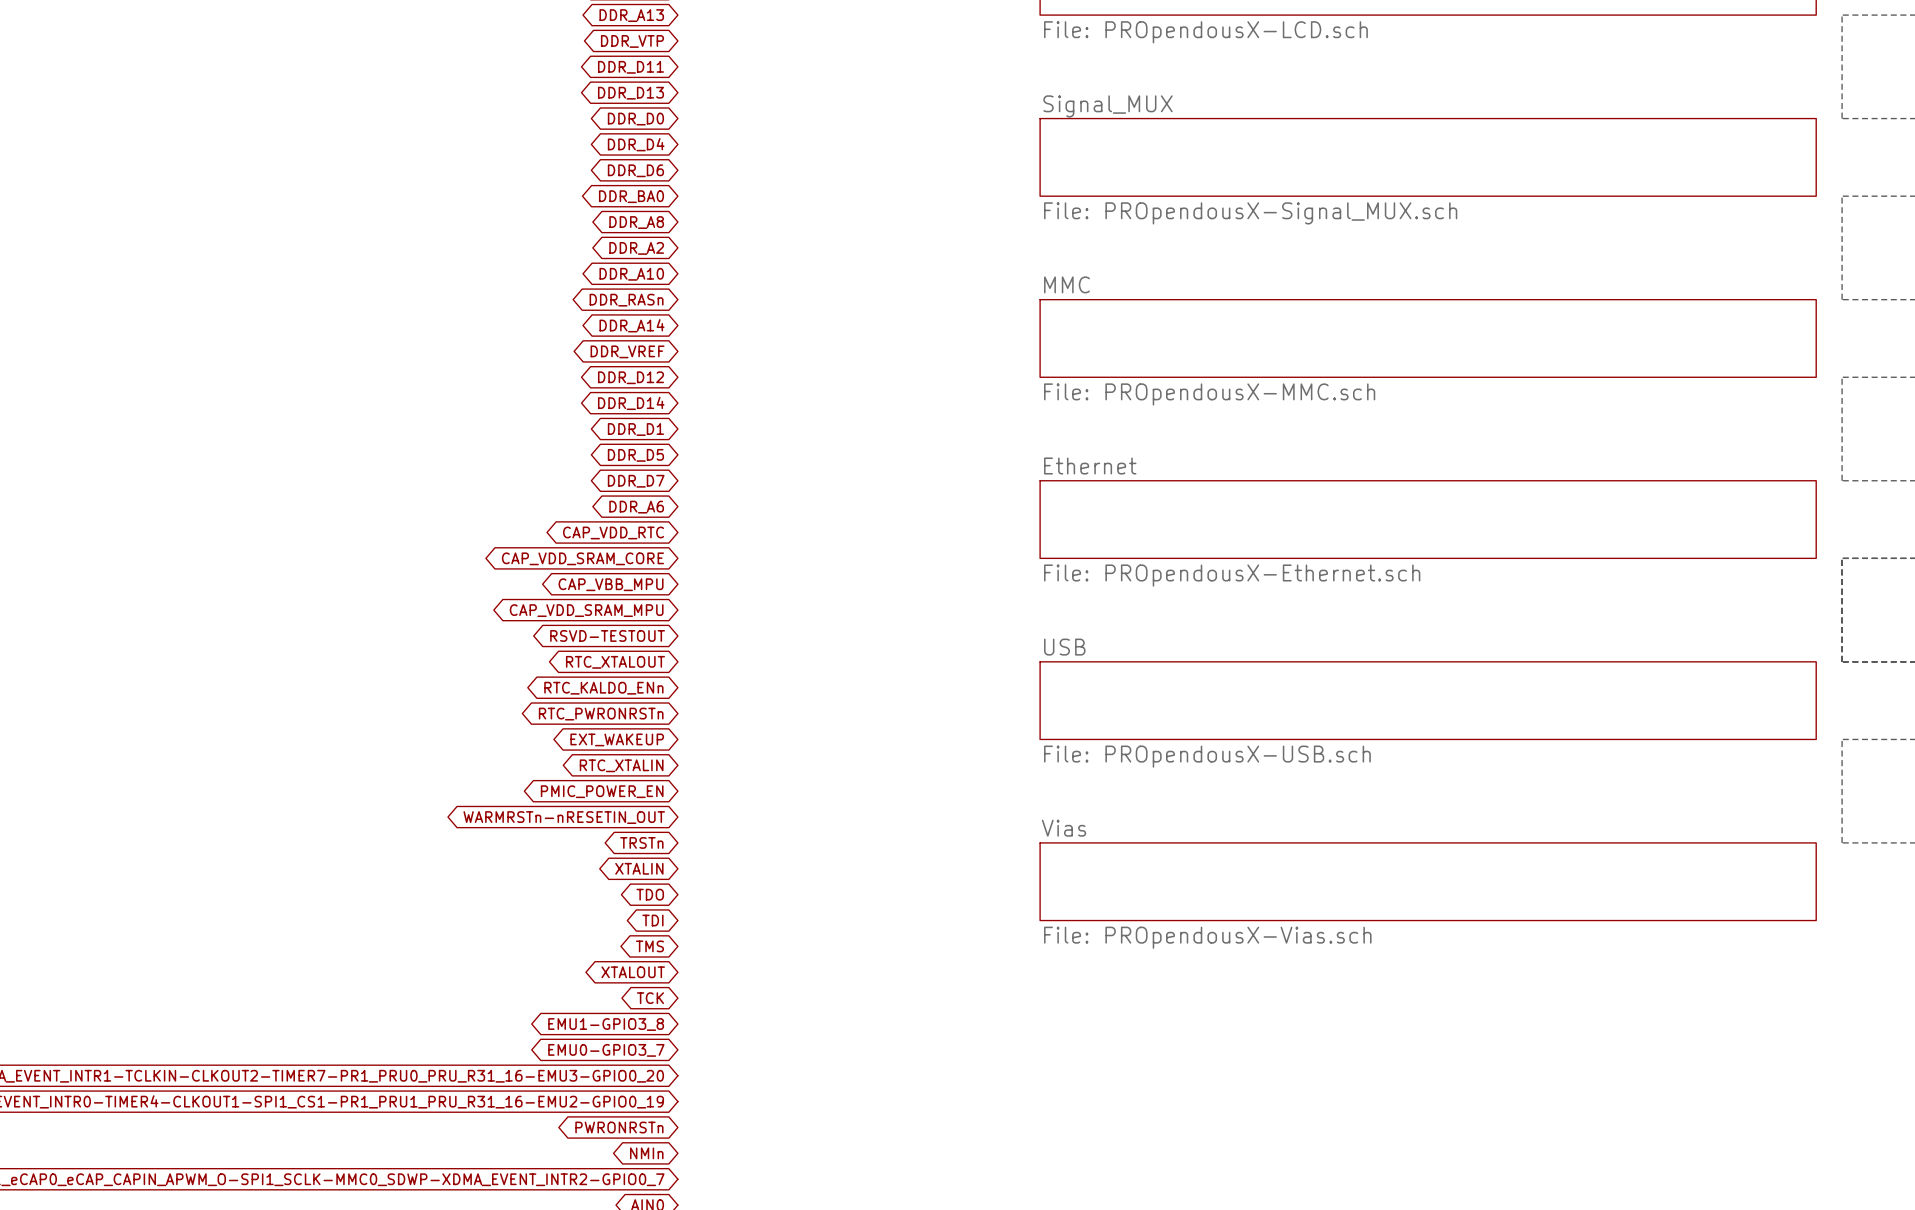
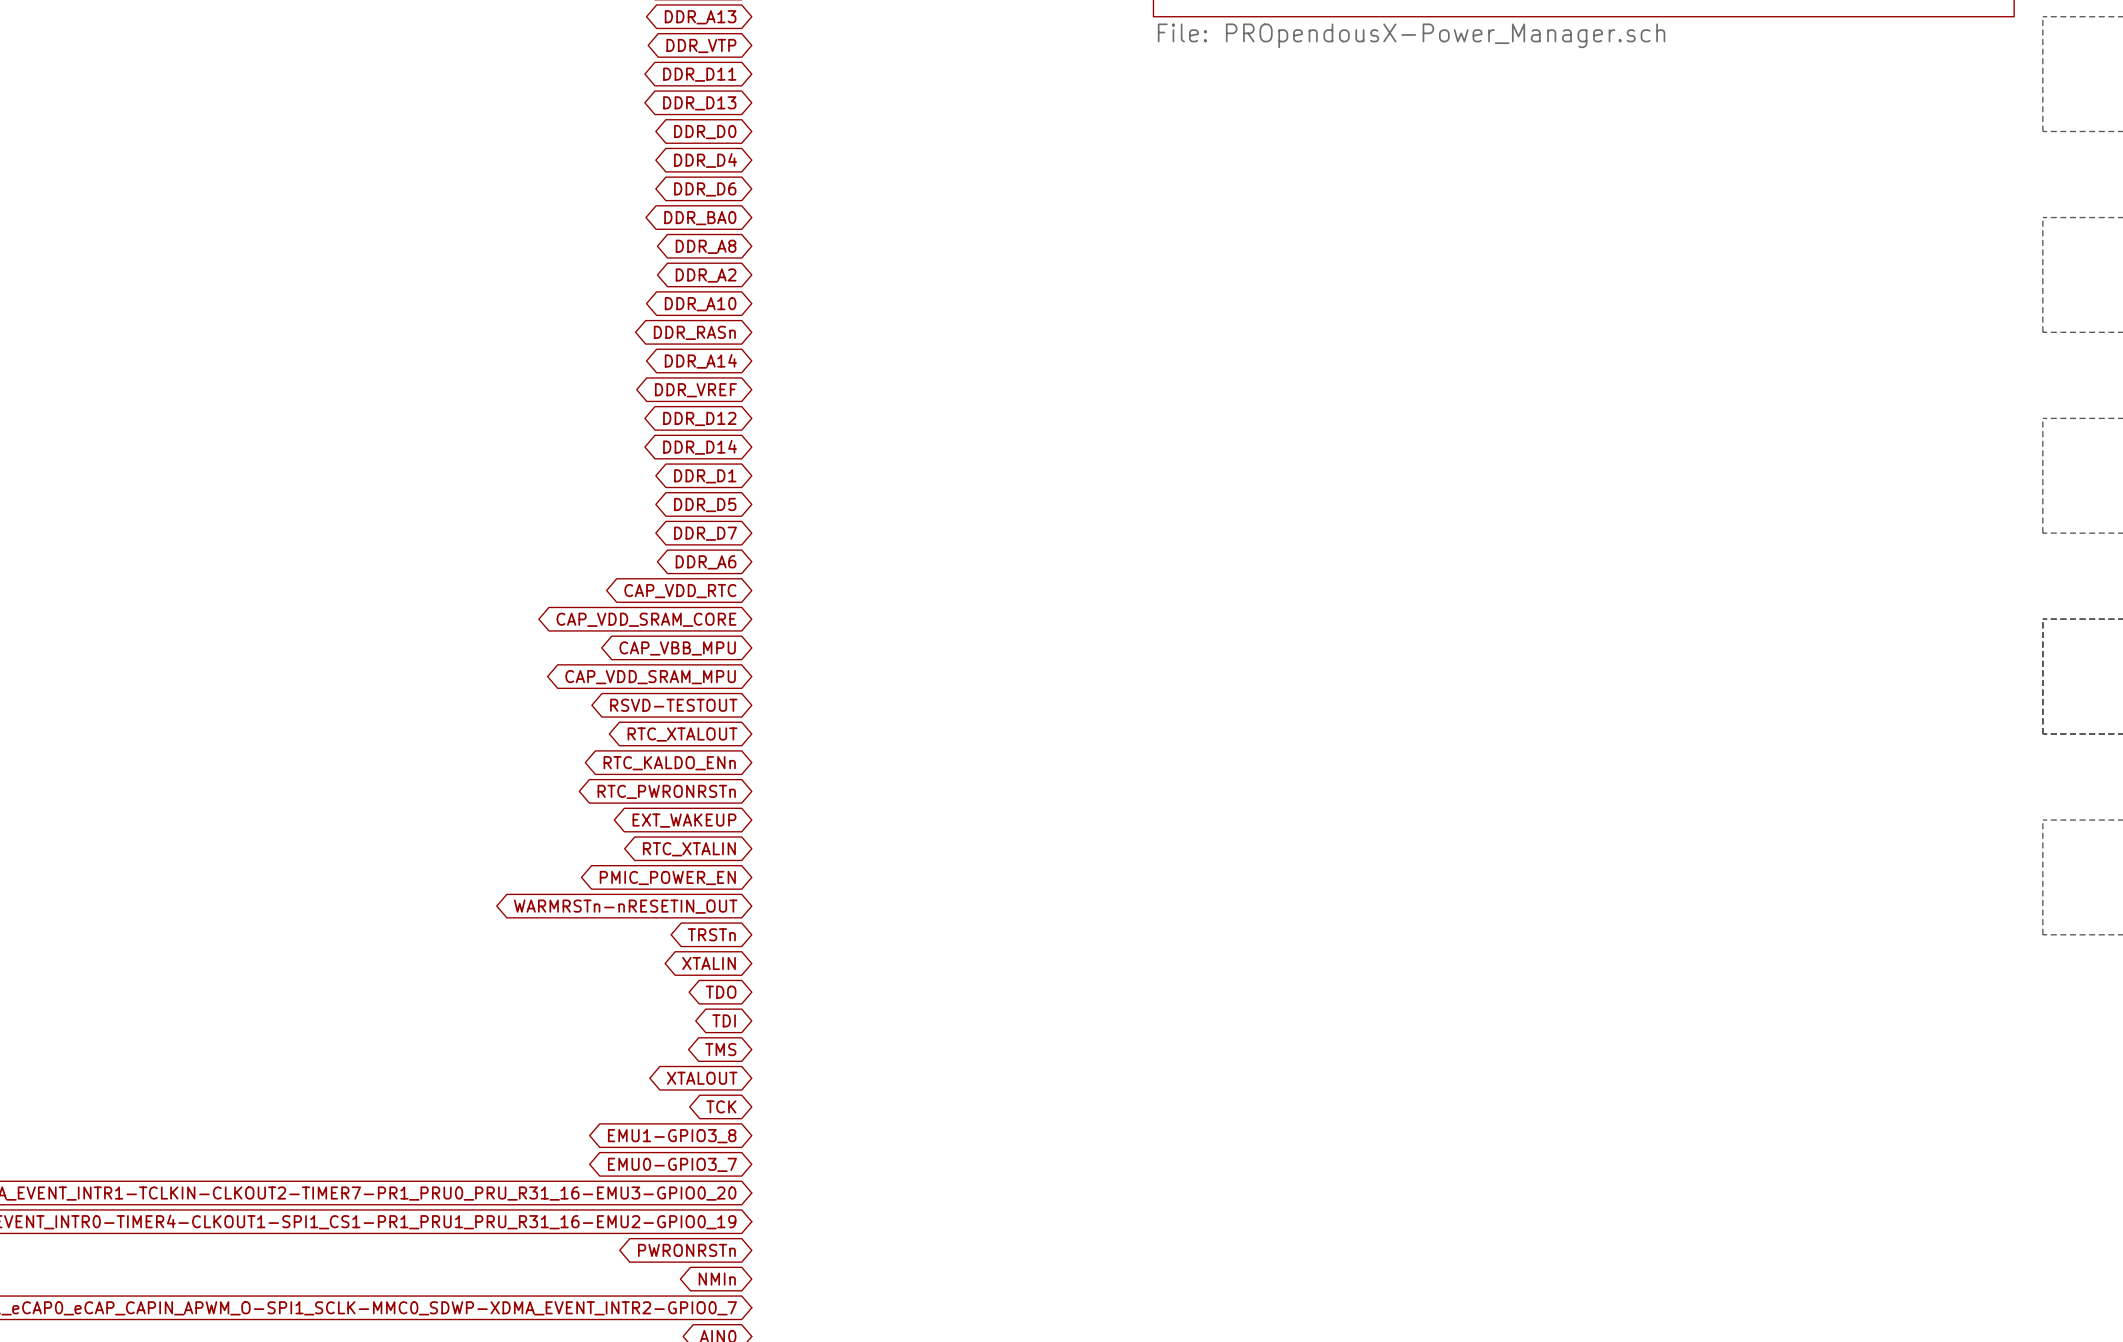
sheet value: File: PROpendousX-LCD.sch (1205, 32) -> File: PROpendousX-Power_Manager.sch (1411, 35)
sheet Signal_MUX: File: PROpendousX-Signal_MUX.sch (1428, 157) -> none
sheet MMC: File: PROpendousX-MMC.sch (1428, 338) -> none
sheet Ethernet: File: PROpendousX-Ethernet.sch (1428, 519) -> none
sheet USB: File: PROpendousX-USB.sch (1428, 700) -> none
sheet Vias: File: PROpendousX-Vias.sch (1428, 881) -> none

